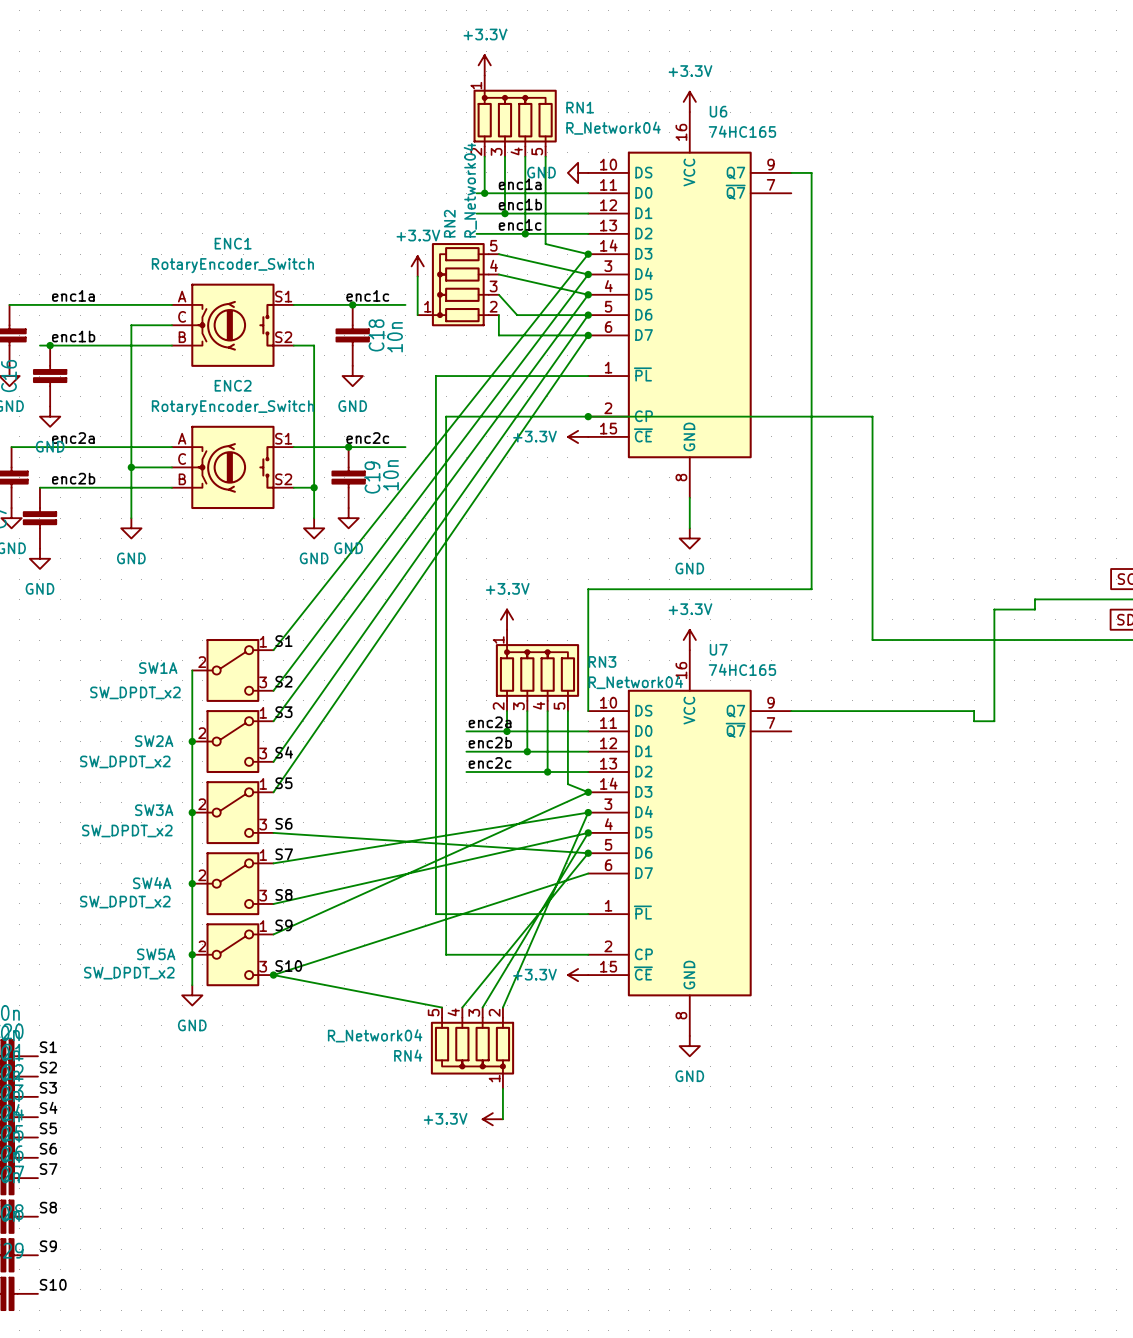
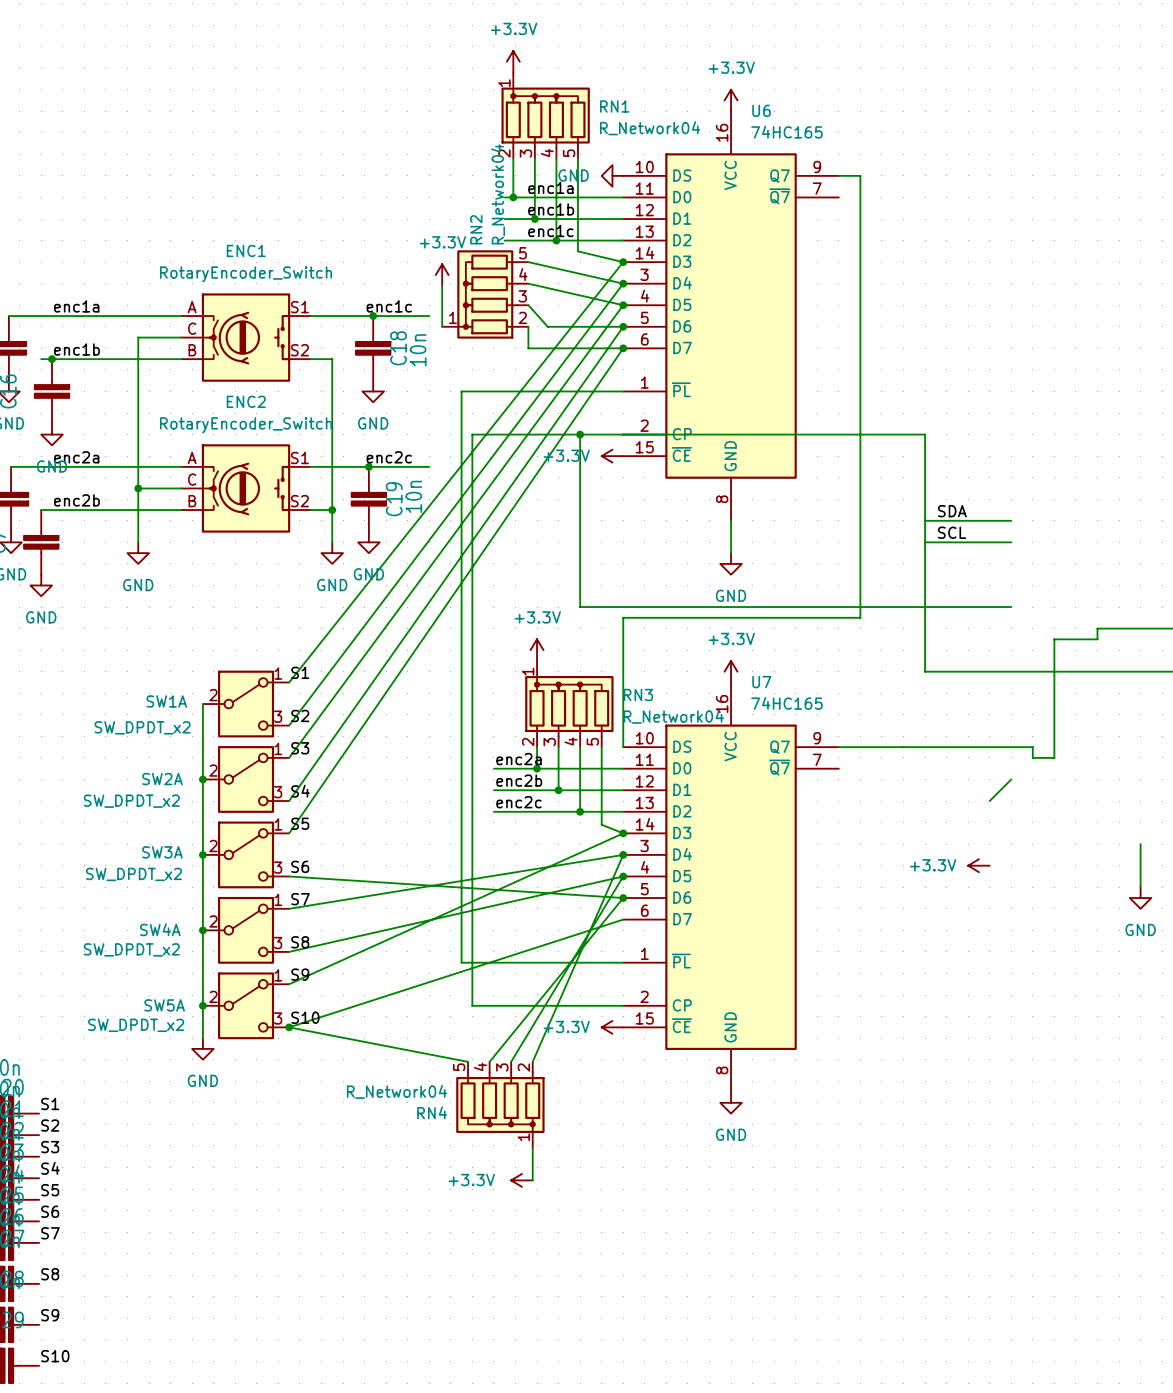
wire: none -> (580, 434) (580, 607) (1011, 607)
junction position: (588, 416) -> (580, 434)
label: none -> SDA (952, 511)
wire: none -> (925, 520) (1011, 520)
label: none -> SCL (952, 532)
wire: none -> (925, 542) (1011, 542)
wire: none -> (1011, 779) (989, 801)
wire: none -> (1140, 844) (1140, 887)
power symbol: none -> +3.3V (978, 865)
power symbol: none -> GND (1140, 898)

